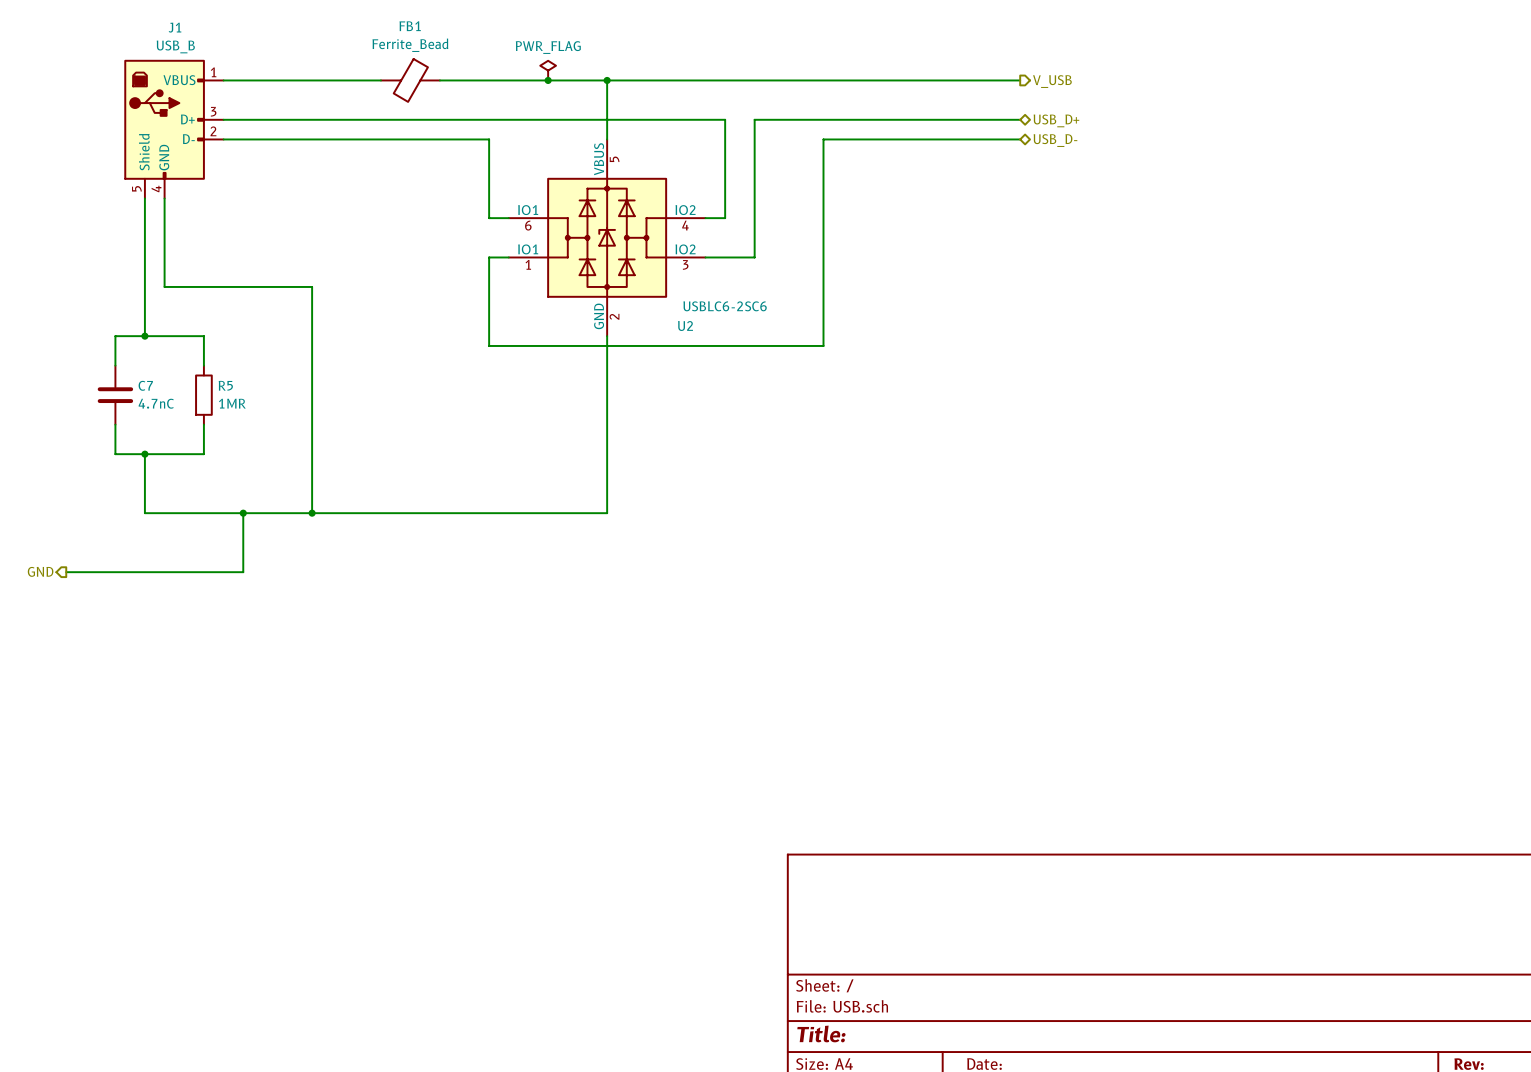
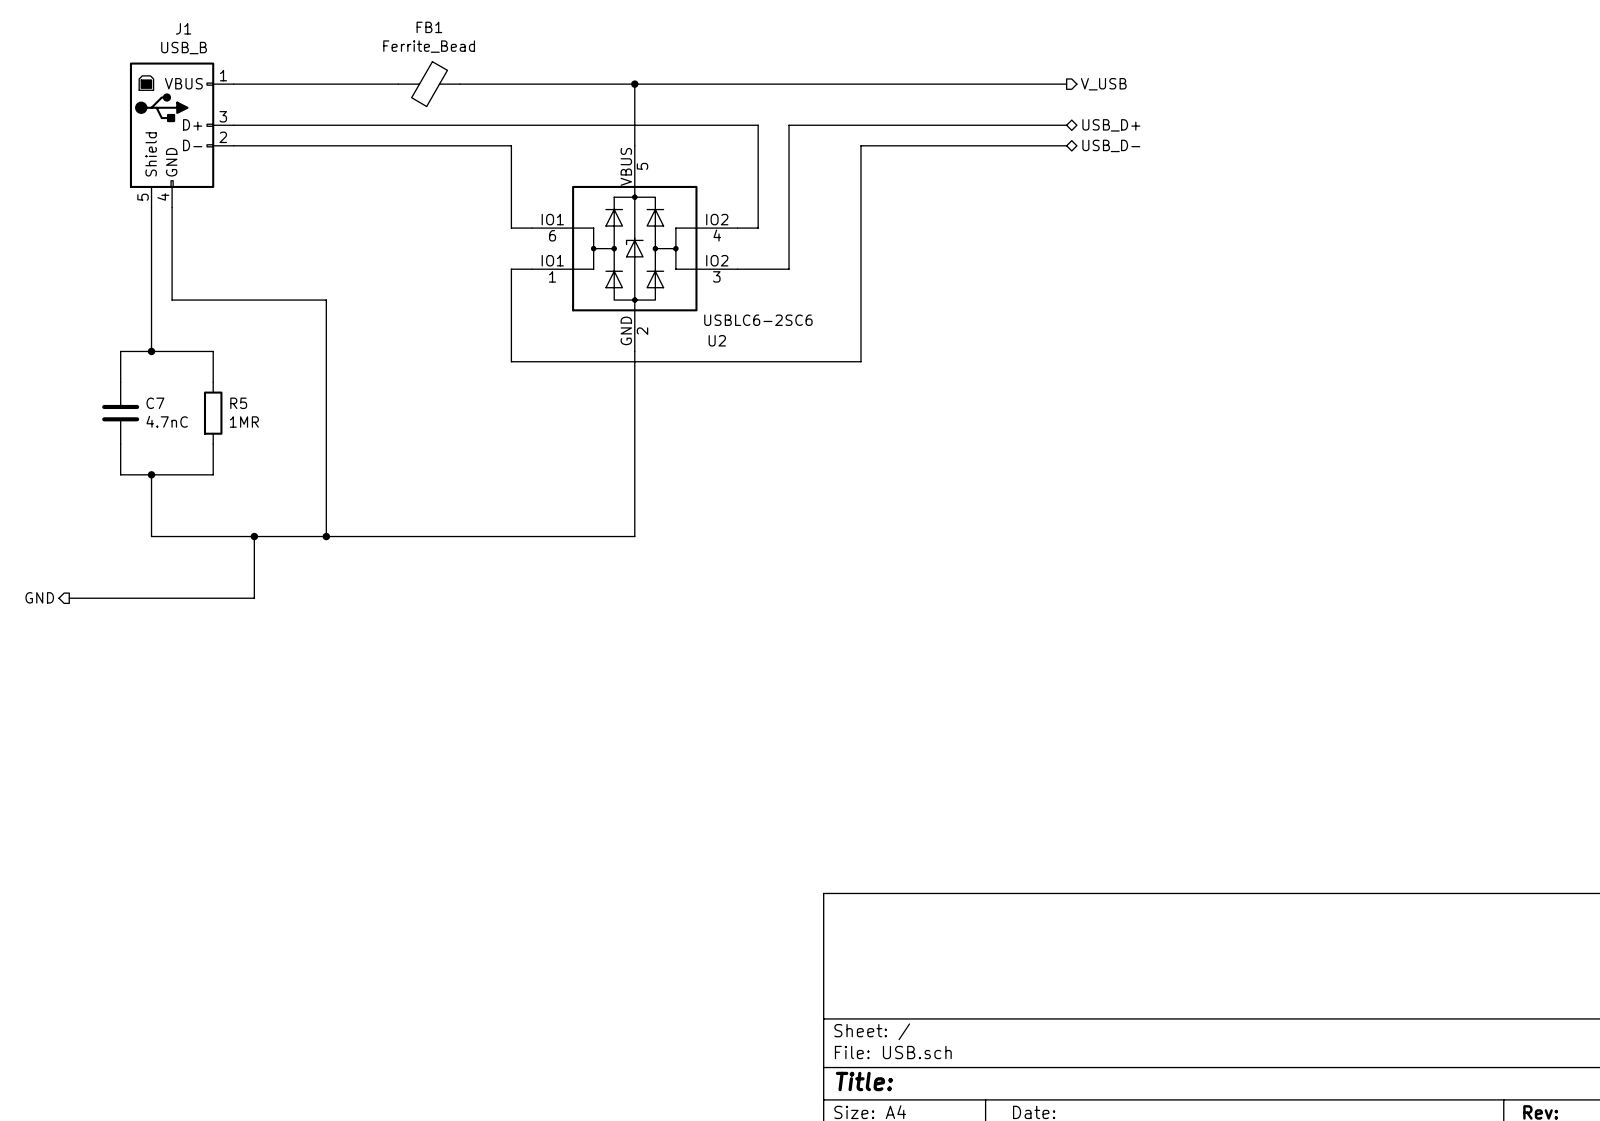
power symbol: PWR_FLAG (548, 70) -> none
junction: (548, 80) -> none

